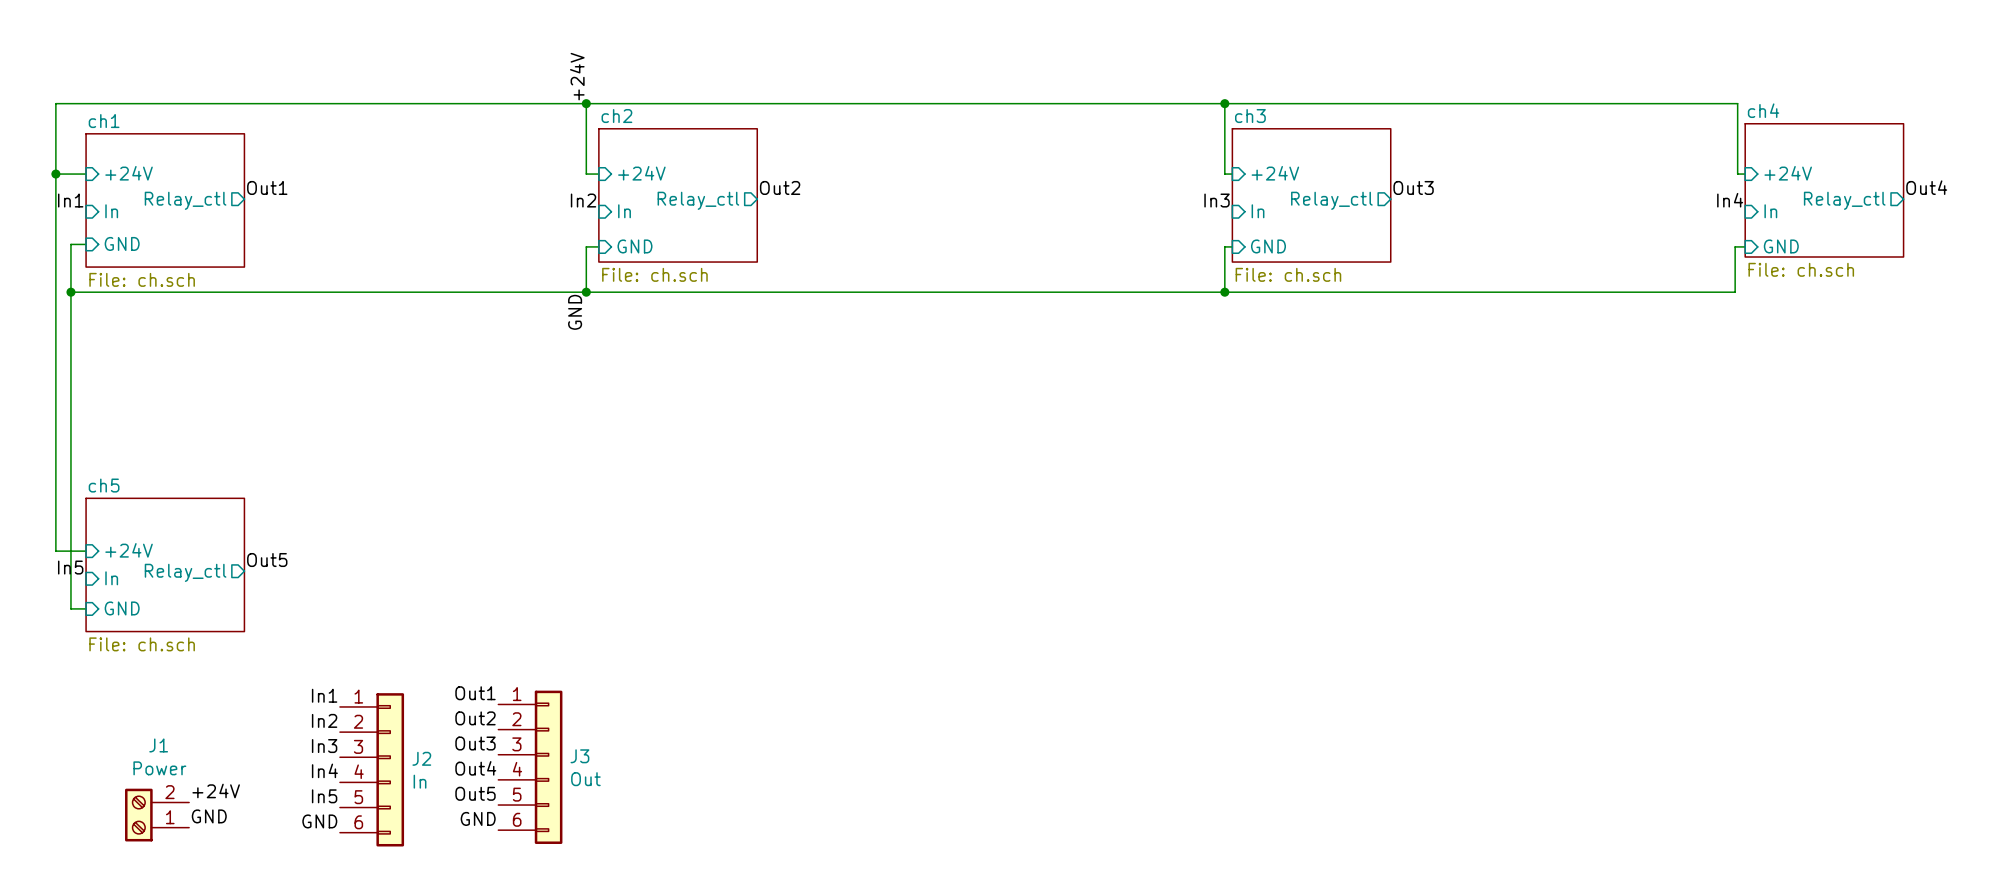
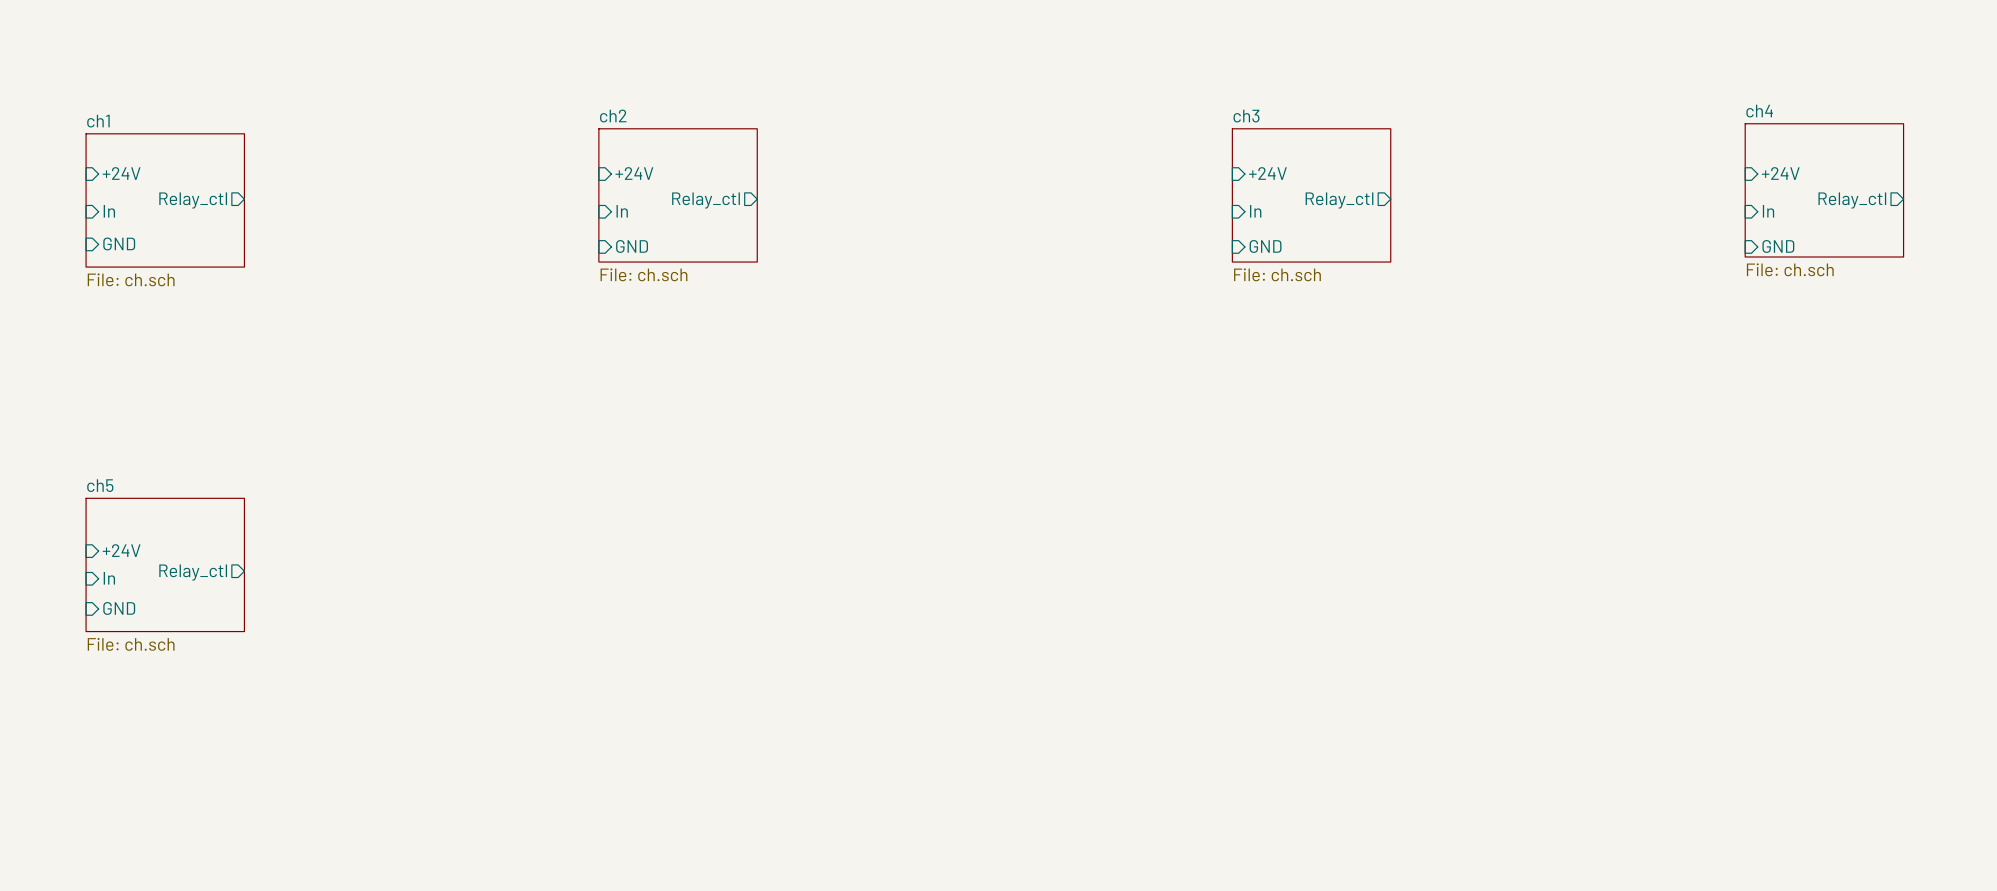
label: +24V (577, 76) -> none
wire: (586, 103) (586, 174) (598, 174) -> none
junction: (586, 103) -> none
wire: (1224, 103) (1224, 174) (1232, 174) -> none
junction: (1224, 103) -> none
wire: (55, 174) (86, 174) -> none
junction: (55, 174) -> none
wire: (1745, 174) (1737, 174) (1737, 103) (55, 103) (55, 551) (86, 551) -> none
label: Out1 (267, 187) -> none
label: Out2 (780, 187) -> none
label: Out3 (1413, 187) -> none
label: Out4 (1926, 187) -> none
label: In1 (70, 200) -> none
label: In2 (583, 200) -> none
label: In3 (1217, 200) -> none
label: In4 (1730, 200) -> none
wire: (86, 244) (70, 244) (70, 608) (86, 608) -> none
wire: (598, 246) (586, 246) (586, 292) -> none
wire: (1232, 246) (1224, 246) (1224, 292) -> none
wire: (1745, 246) (1735, 246) (1735, 292) (70, 292) -> none
junction: (70, 292) -> none
junction: (586, 292) -> none
junction: (1224, 292) -> none
label: GND (575, 312) -> none
label: Out5 (267, 560) -> none
label: In5 (70, 567) -> none
label: Out1 (475, 693) -> none
label: In1 (324, 695) -> none
label: Out2 (475, 718) -> none
label: In2 (324, 720) -> none
label: Out3 (475, 743) -> none
label: In3 (324, 746) -> none
J3: Out (530, 767) -> none
label: Out4 (475, 768) -> none
J2: In (372, 769) -> none
label: In4 (324, 770) -> none
label: +24V (216, 790) -> none
label: Out5 (475, 793) -> none
label: In5 (324, 796) -> none
J1: Power (157, 815) -> none
label: GND (209, 816) -> none
label: GND (478, 818) -> none
label: GND (319, 821) -> none

